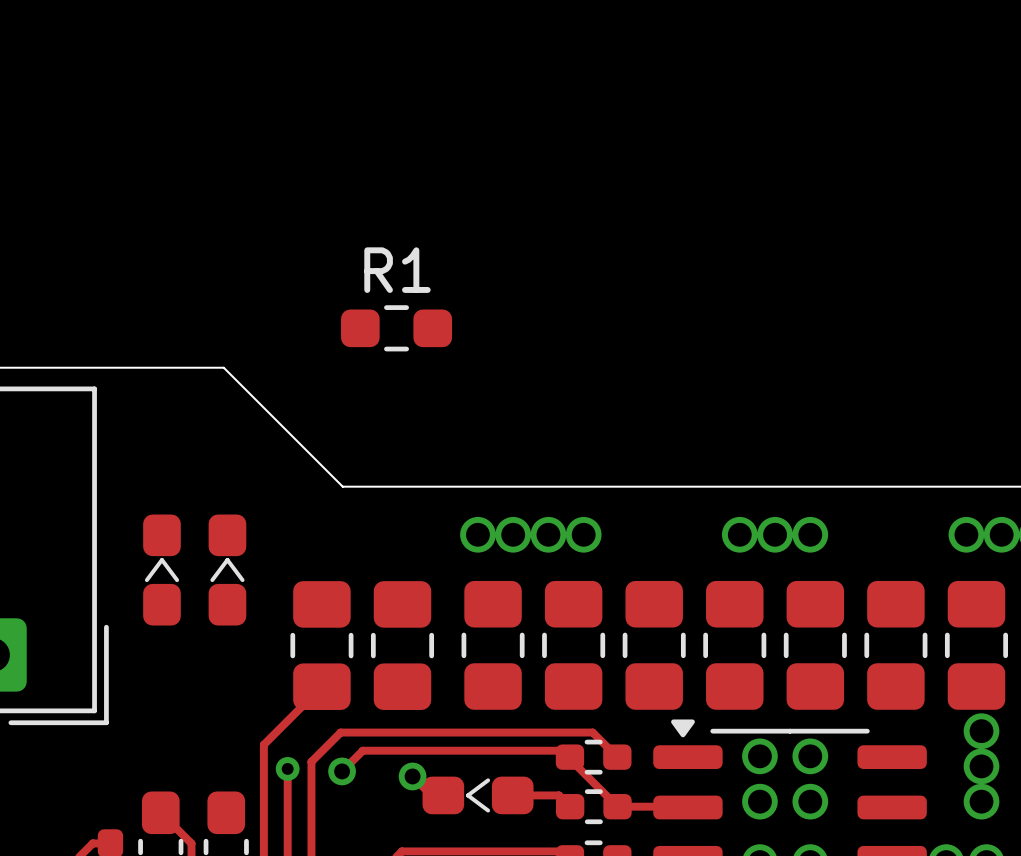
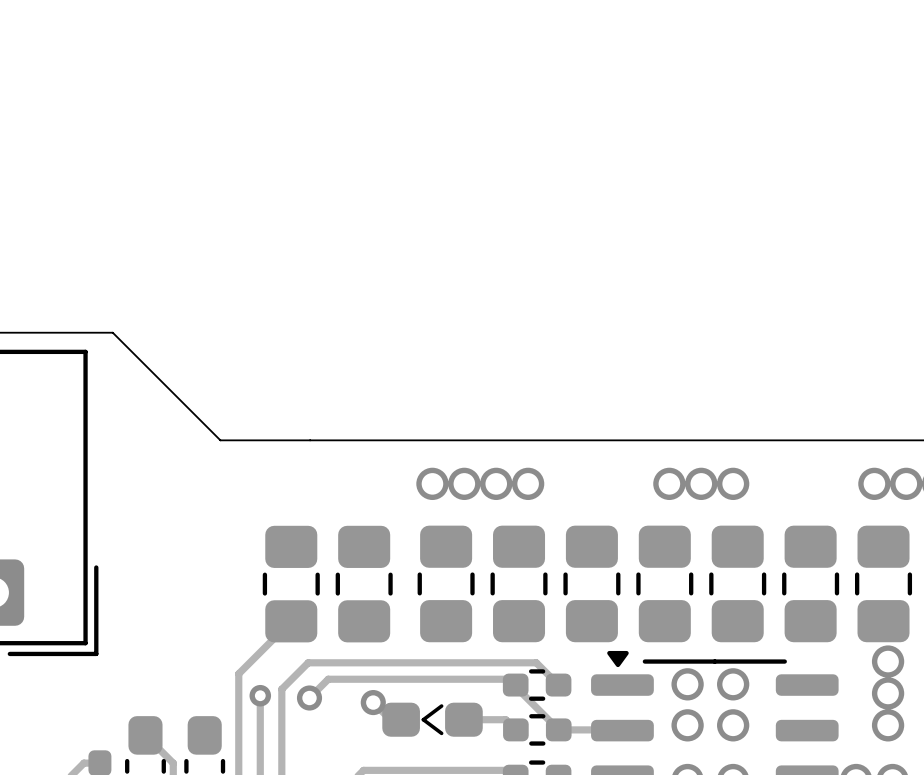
R1: (396, 328) -> none
board edge: (124, 367) (223, 367) (342, 486) -> (112, 332) (220, 440) (310, 440)
part: (161, 570) -> none
part: (227, 570) -> none

